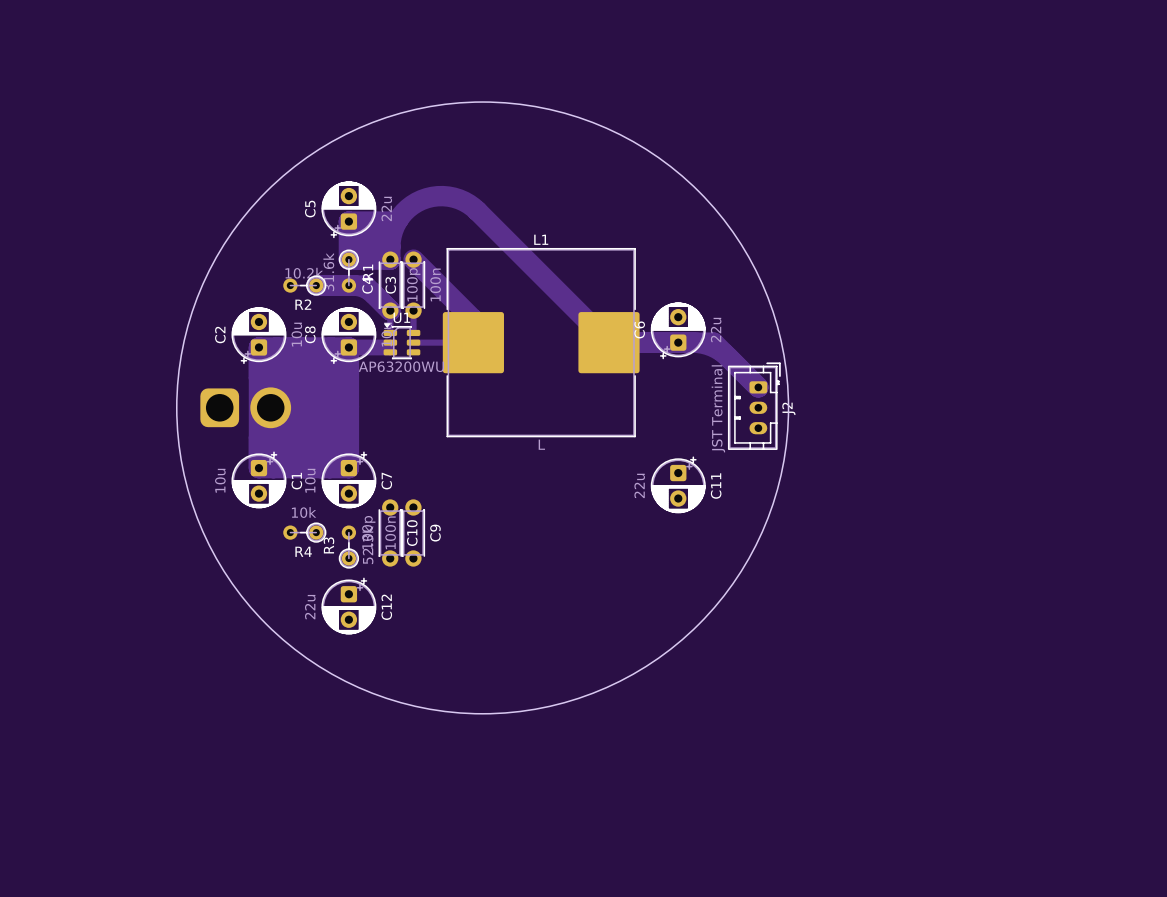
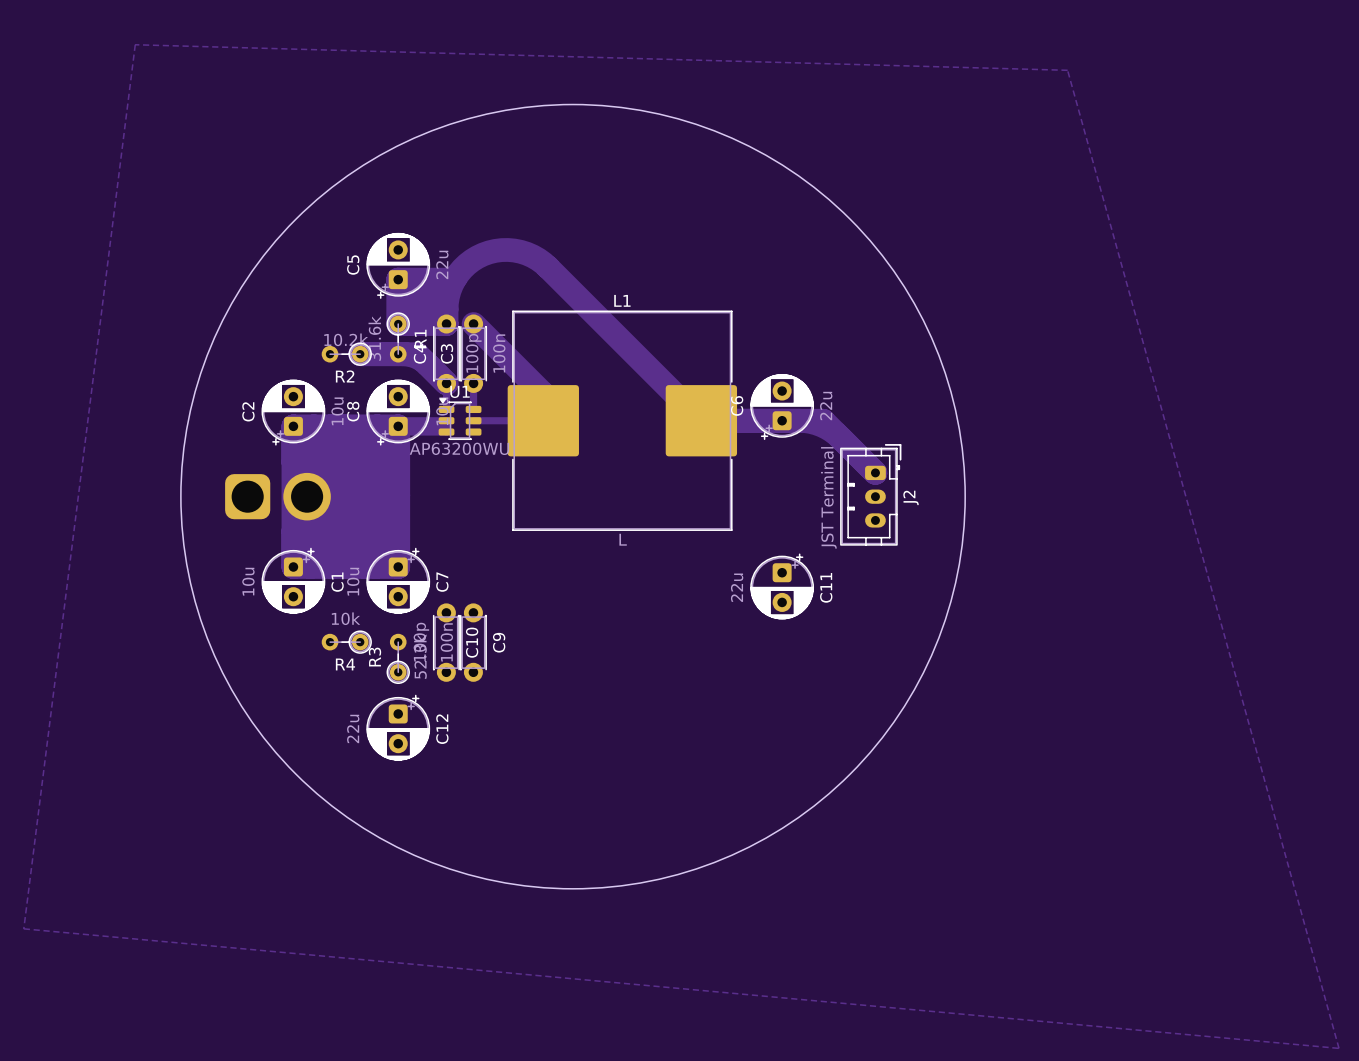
zone outline: none -> (135, 44) (1067, 70) (1339, 1048) (23, 928) (135, 44)
round board edge: none -> [180, 104, 966, 890]
round board edge: [176, 101, 789, 715] -> none

